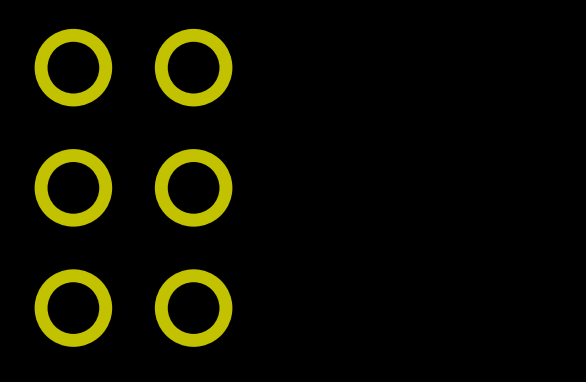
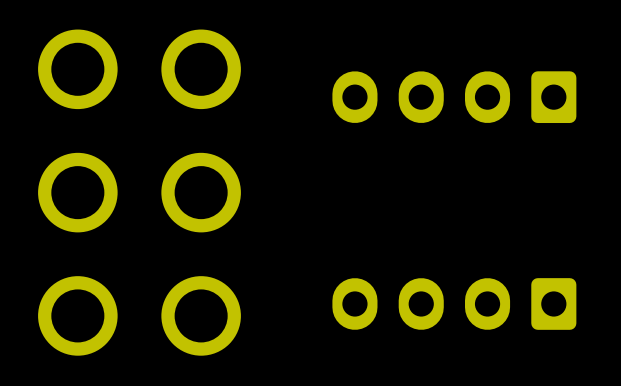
part: none -> (454, 97)
part: none -> (454, 303)

